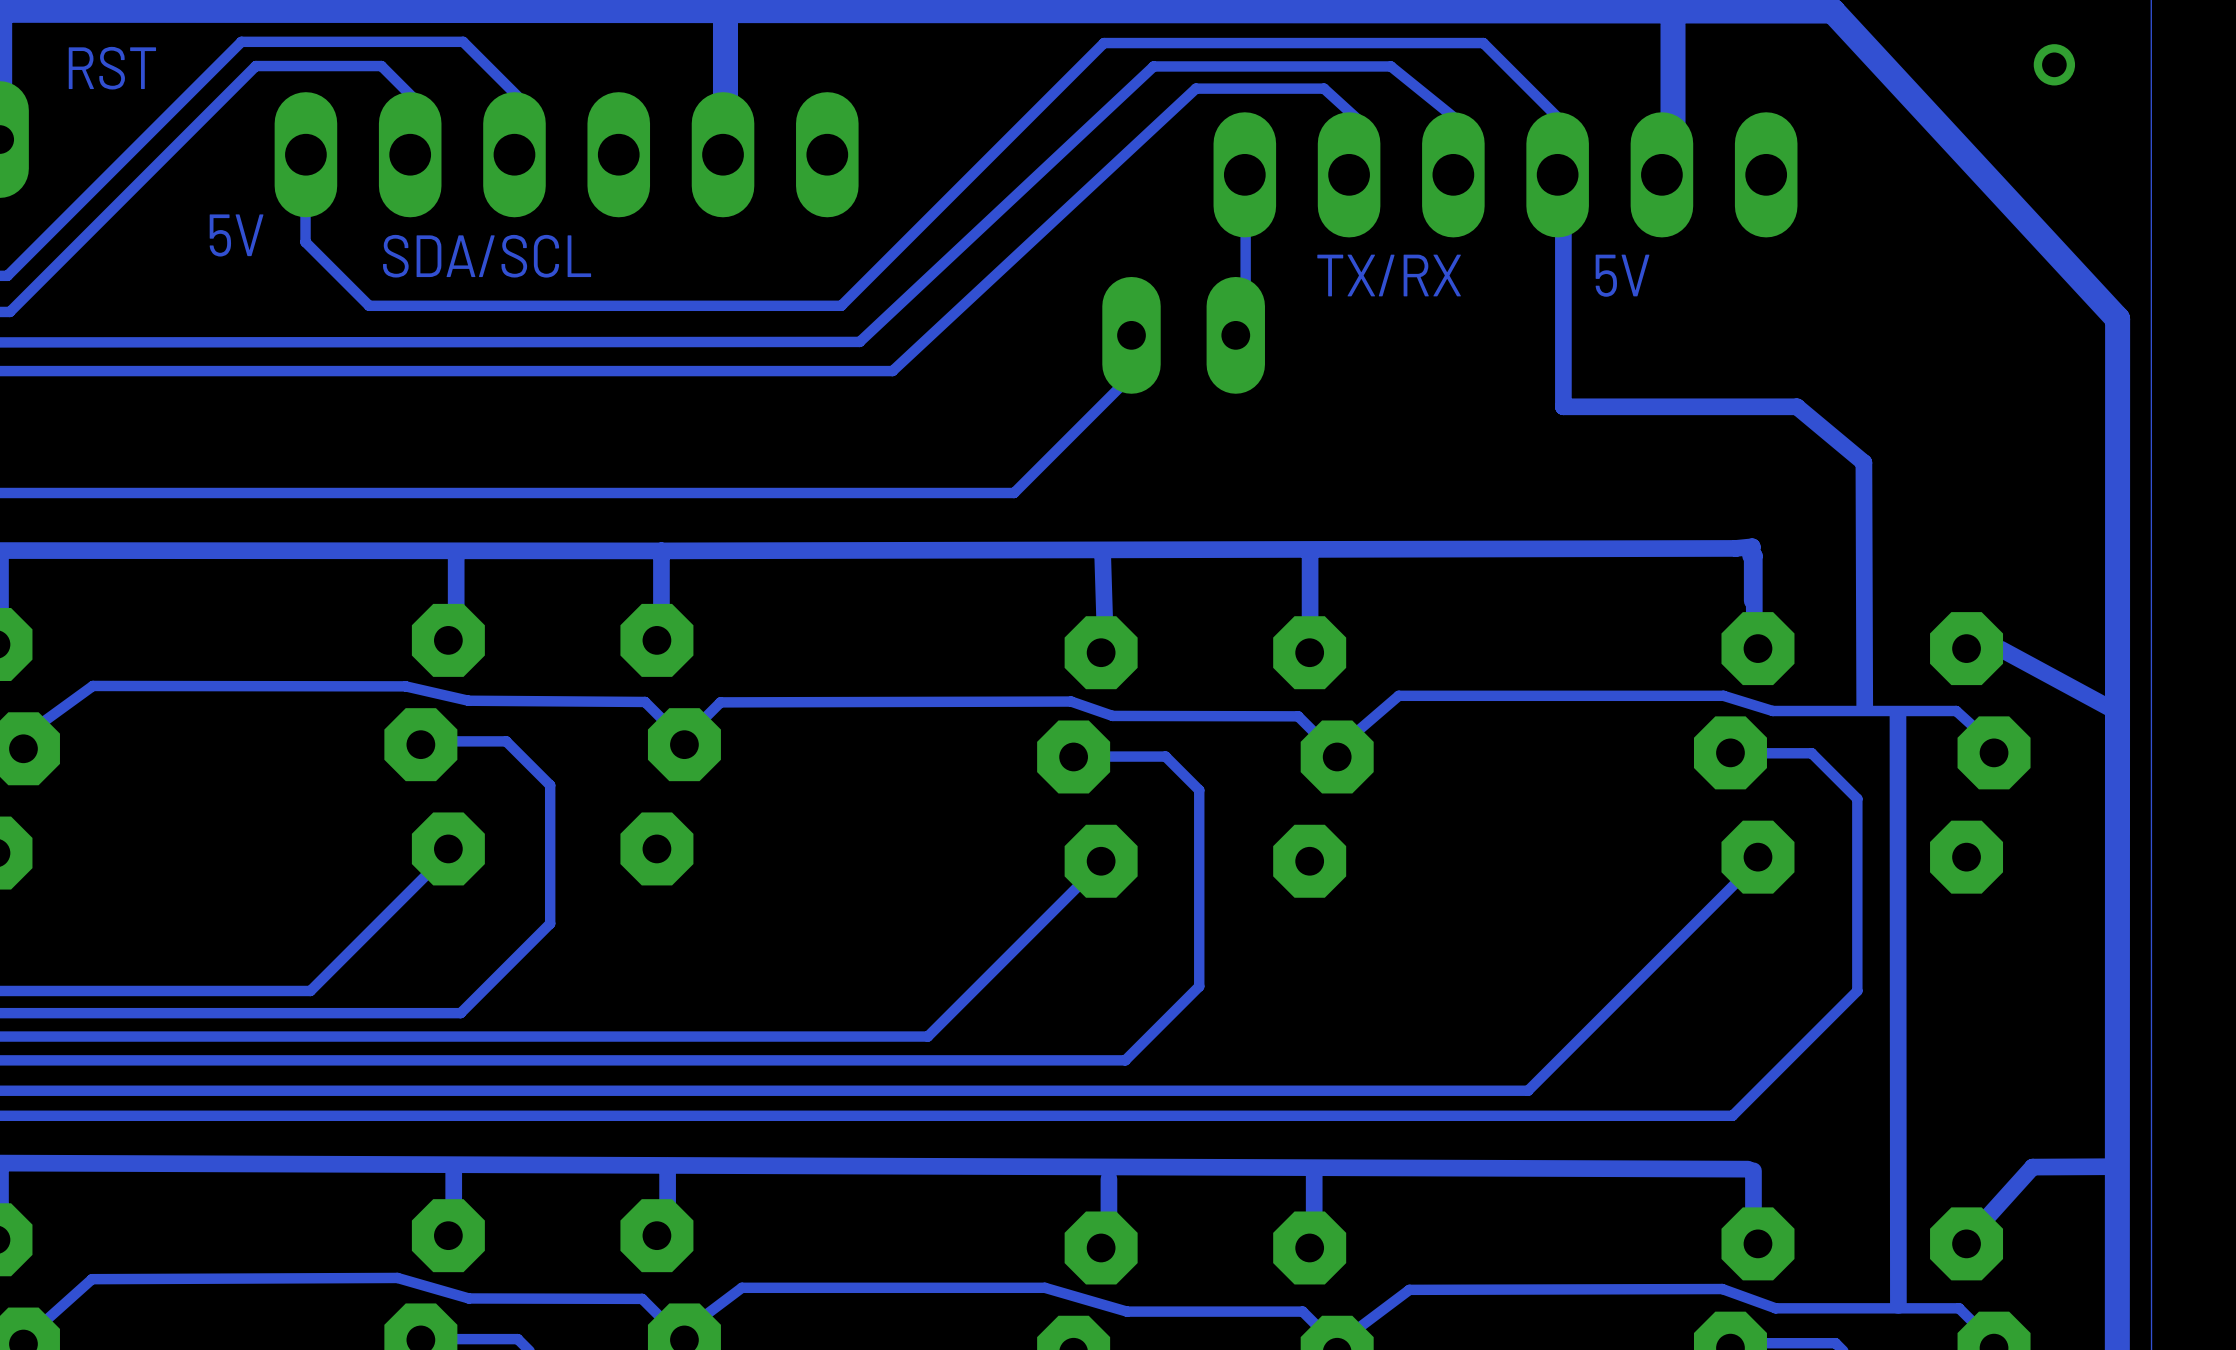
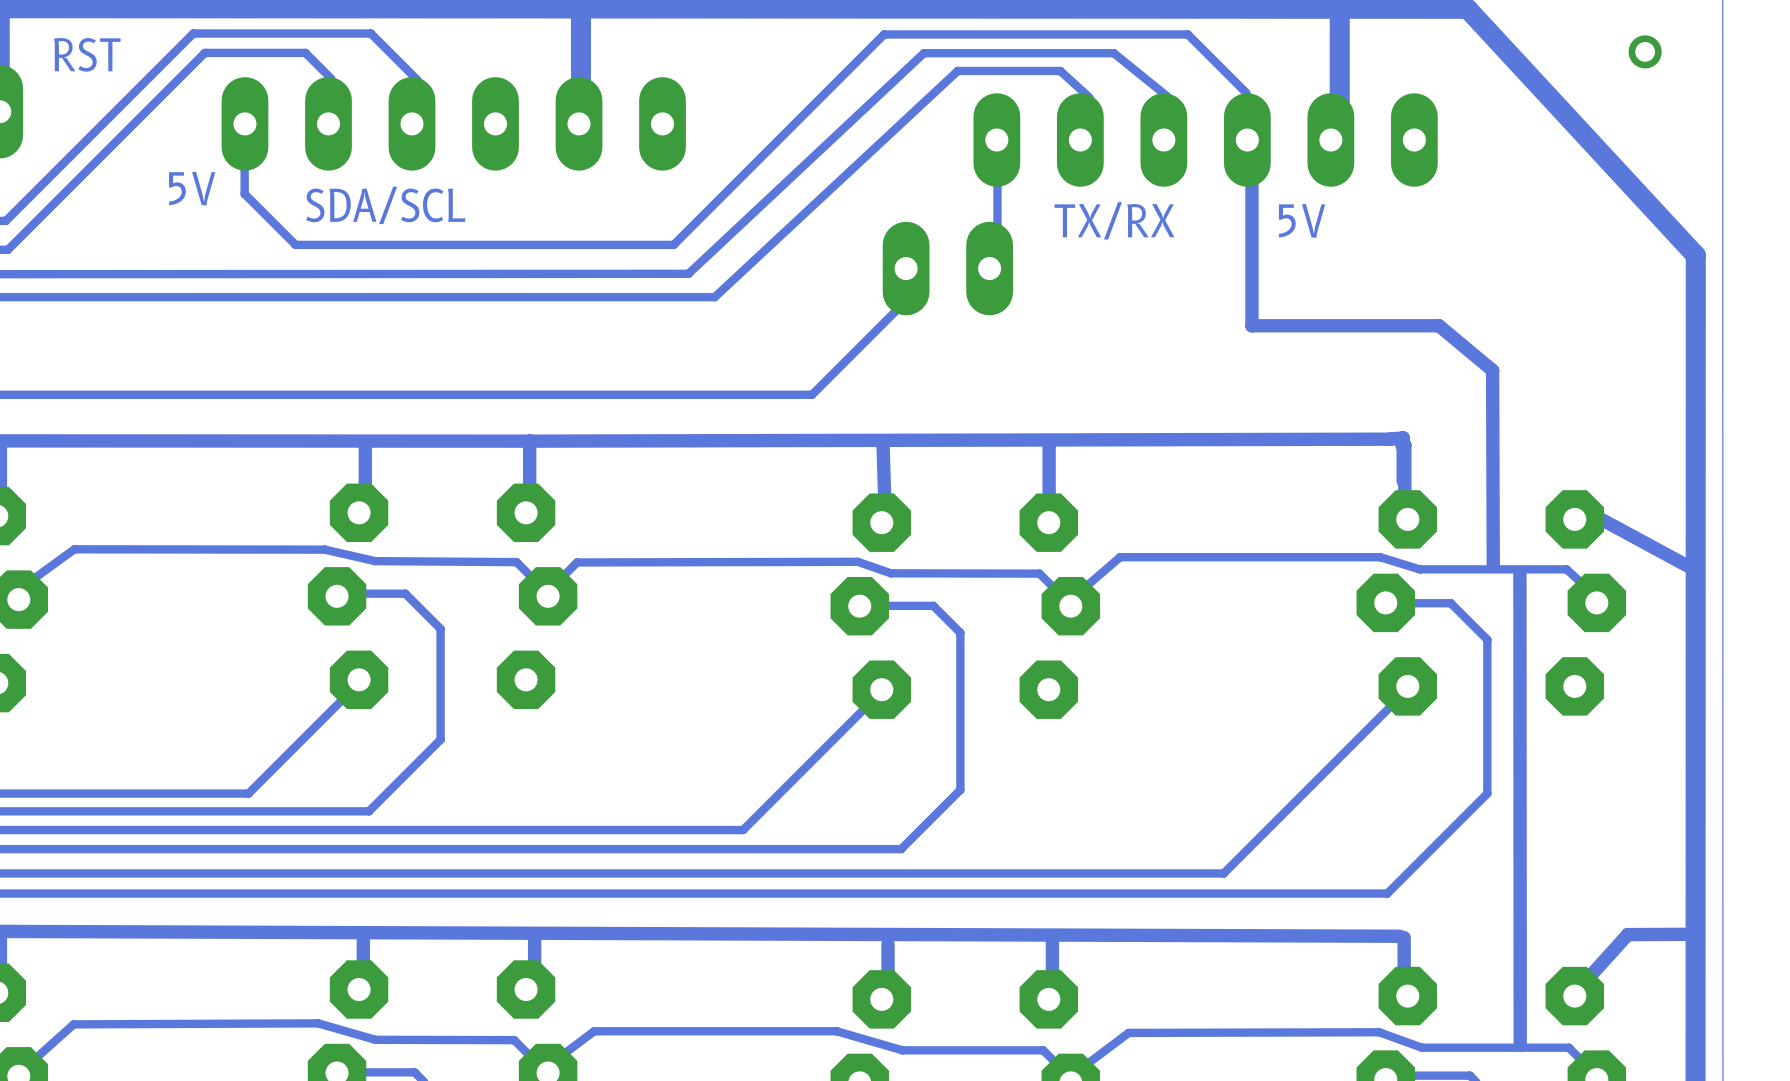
part footprint: [274, 92, 859, 218] -> [221, 77, 686, 171]
part footprint: [1213, 112, 1798, 238] -> [973, 93, 1438, 187]

